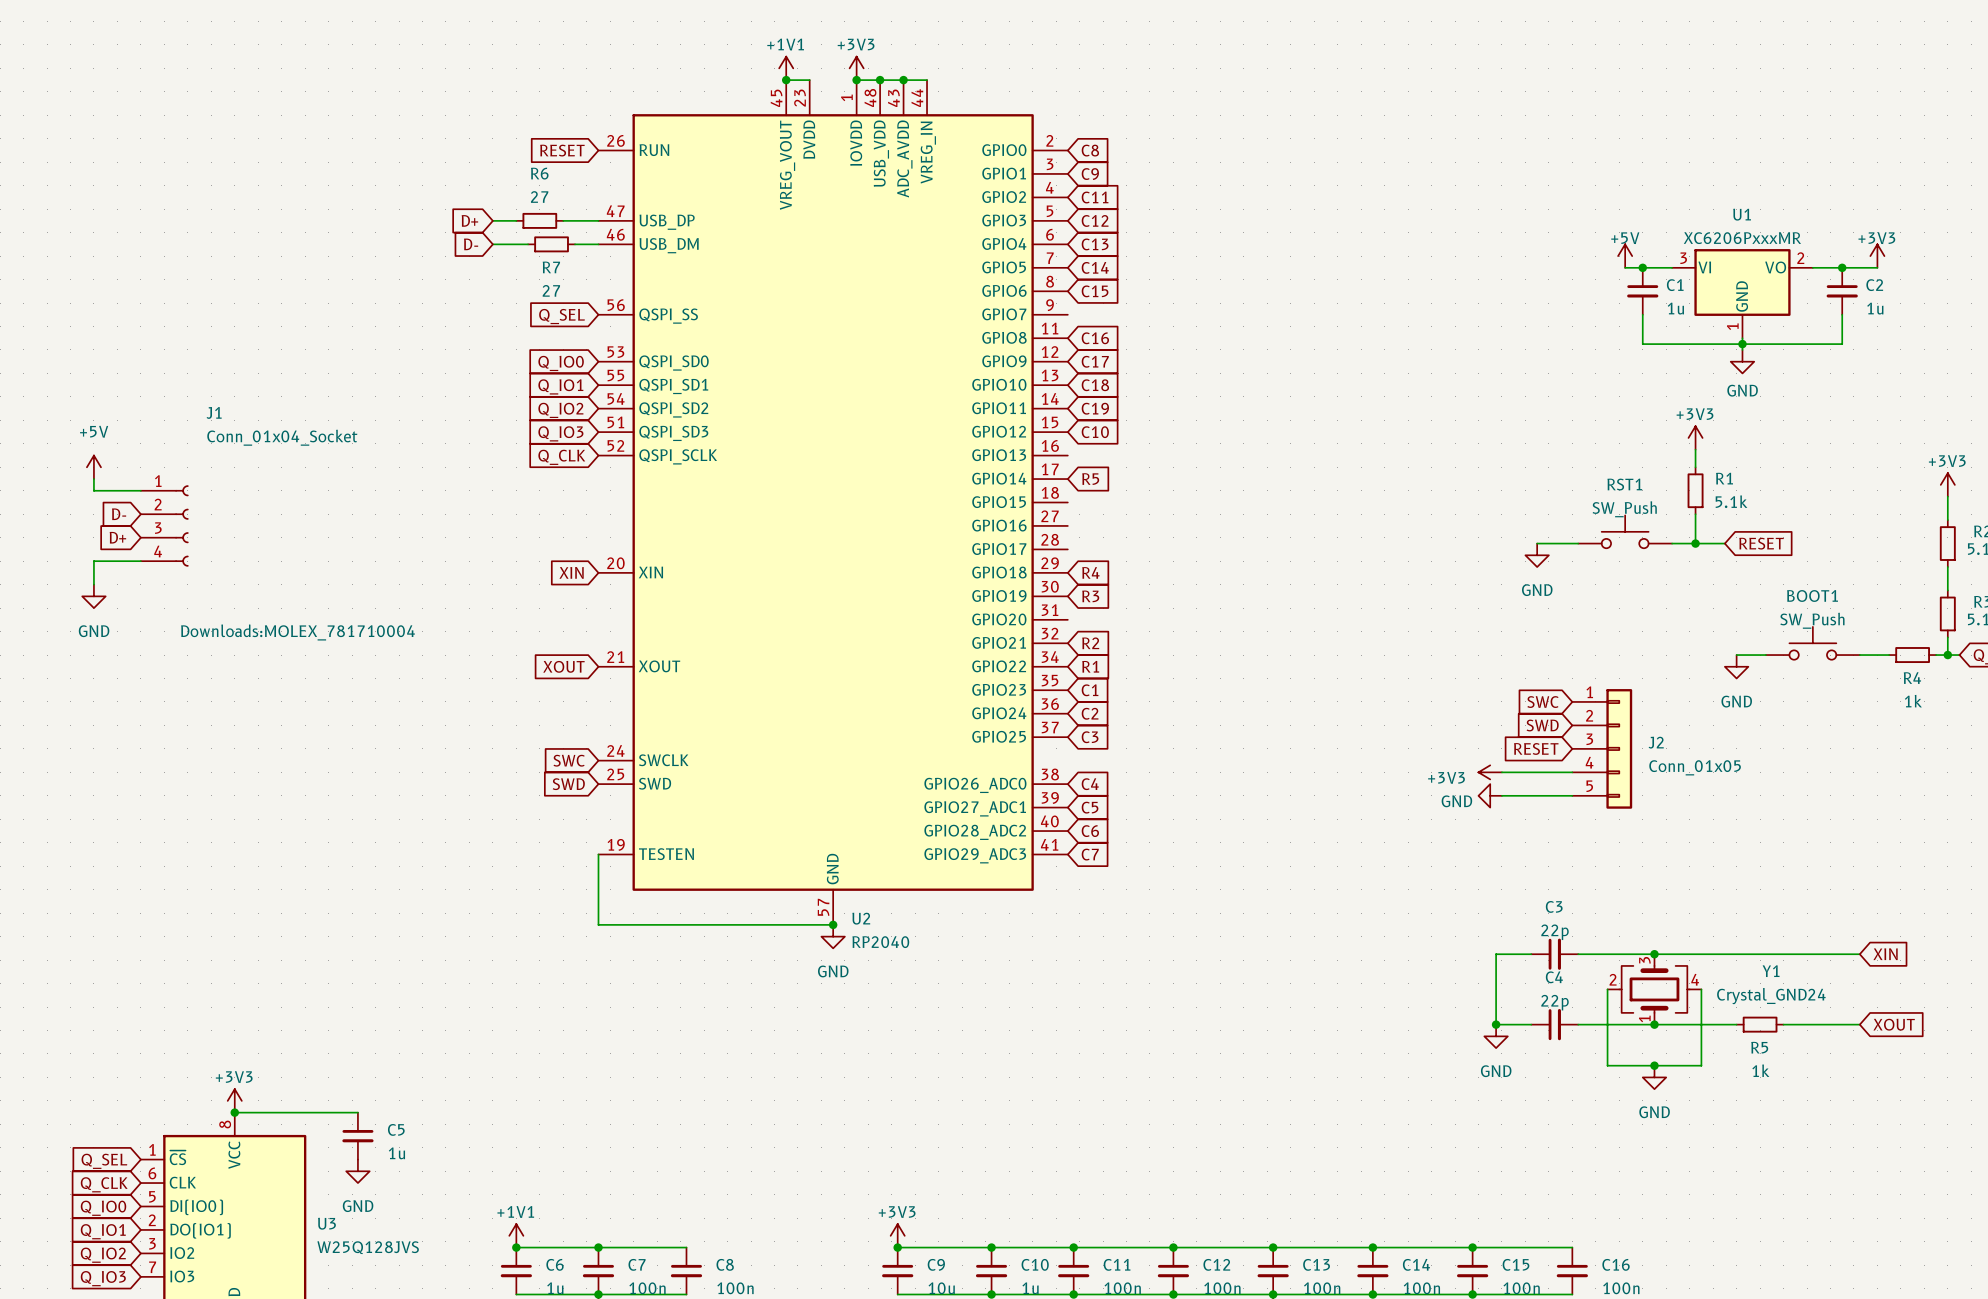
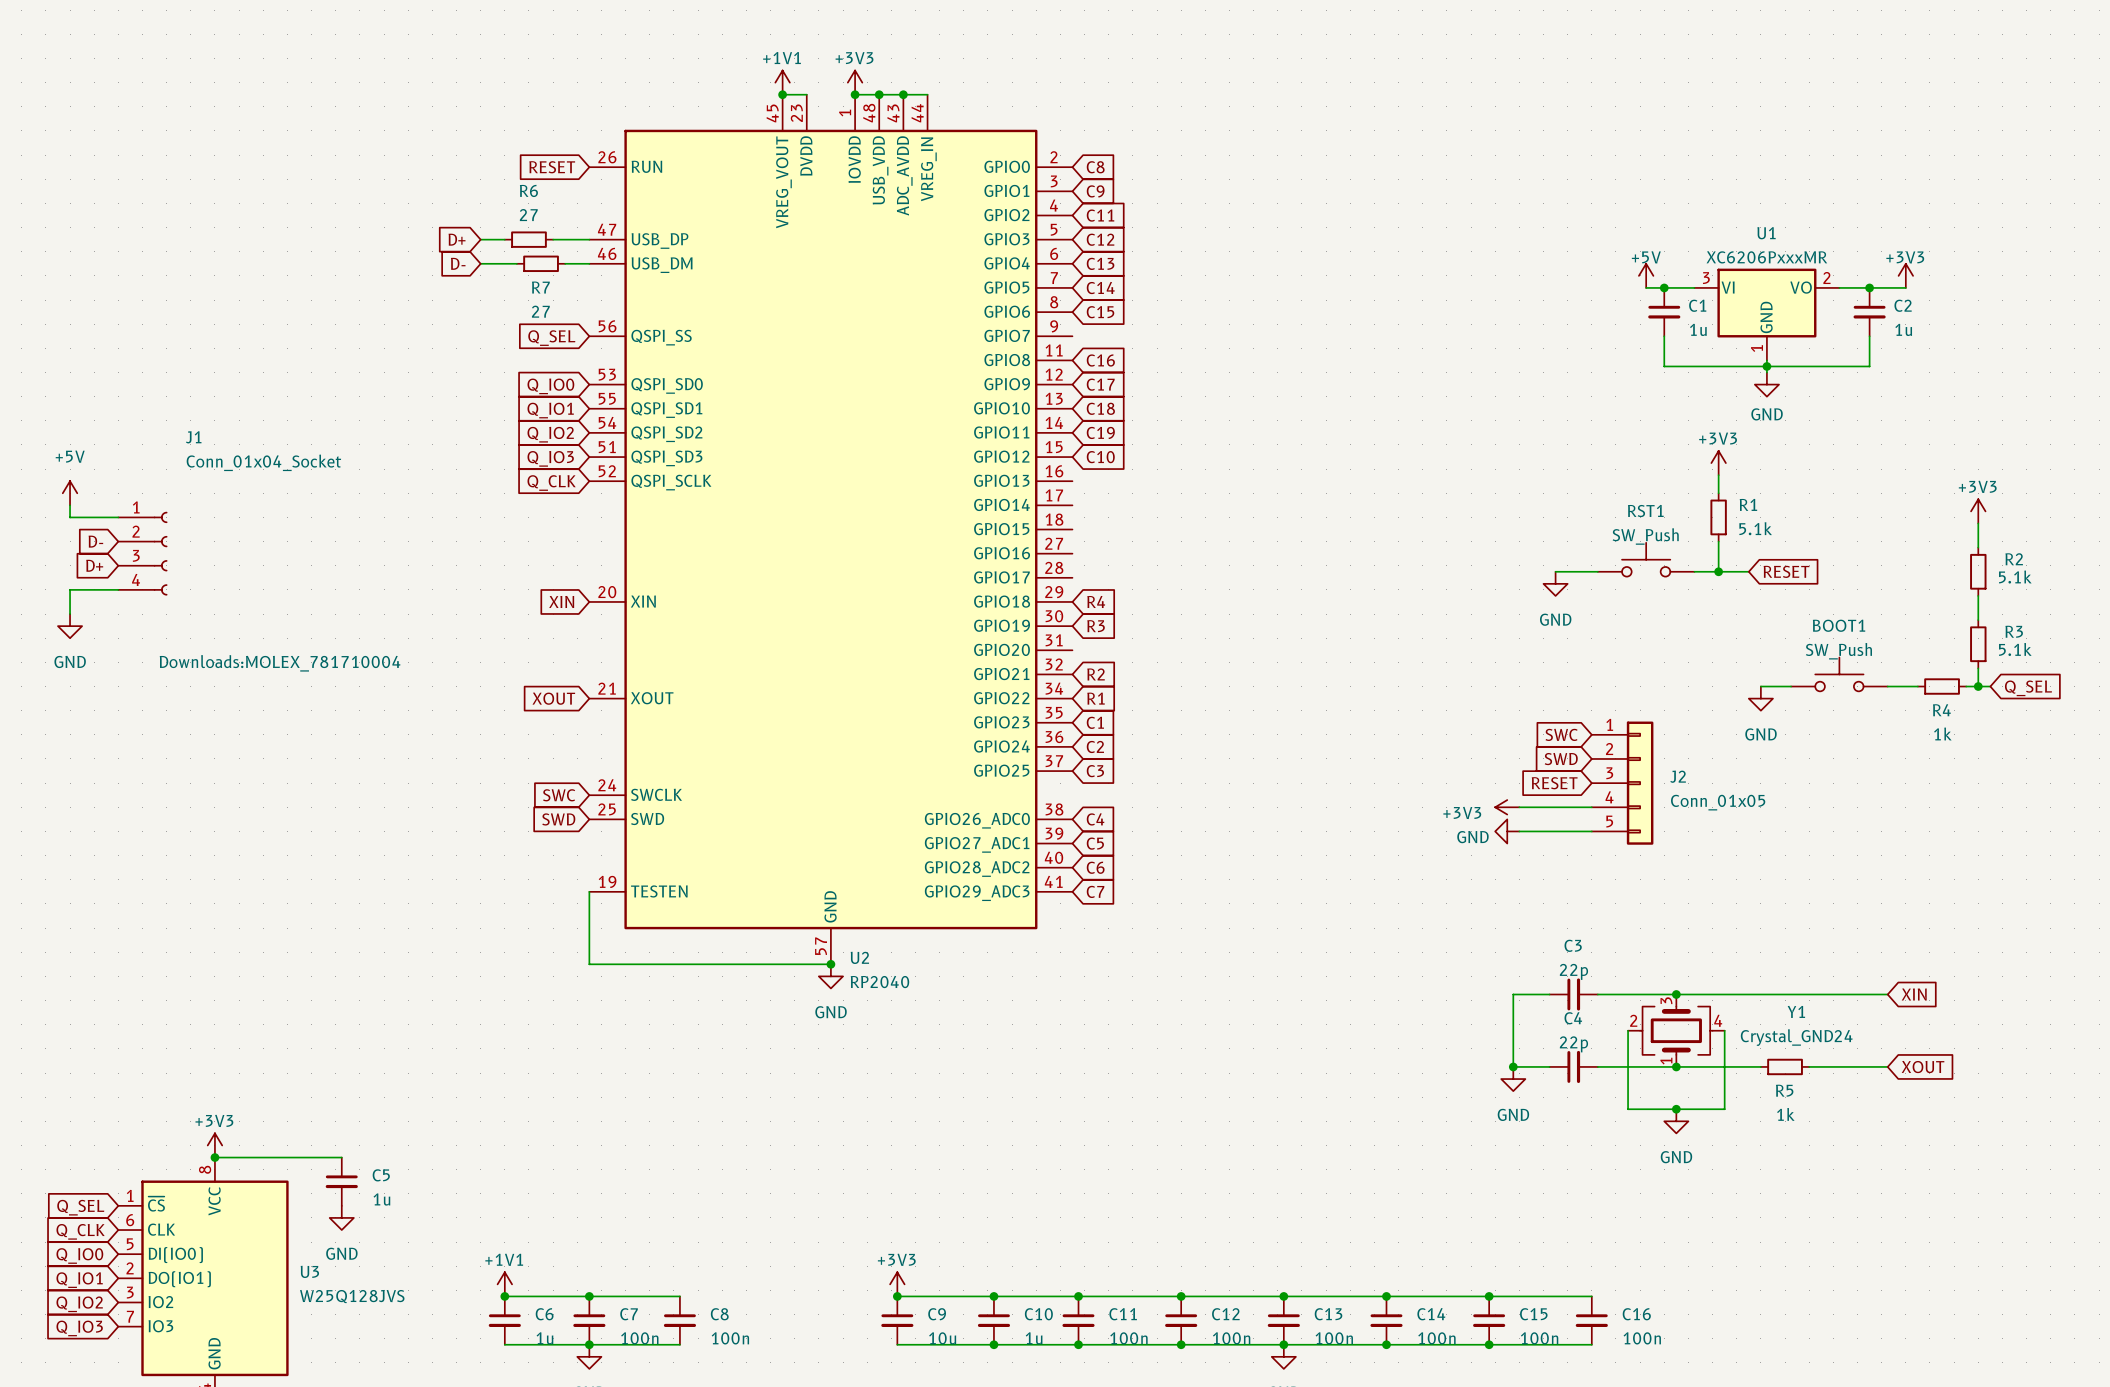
global label: R5 (1090, 479) -> none

